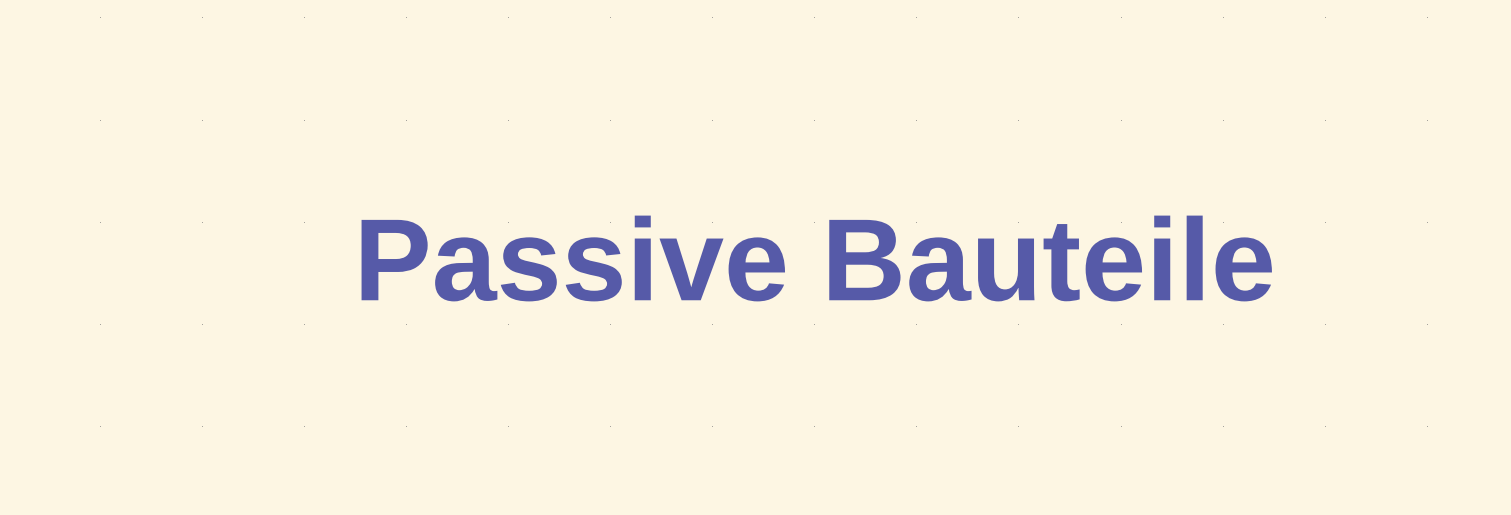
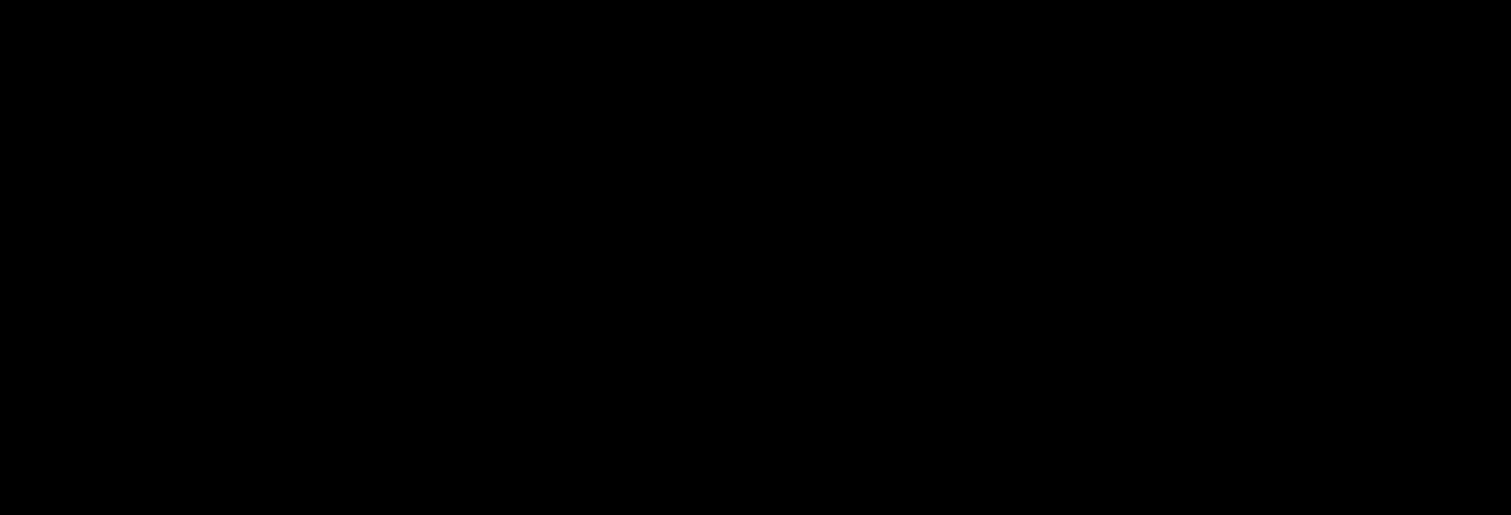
text: Passive Bauteile (816, 258) -> none

